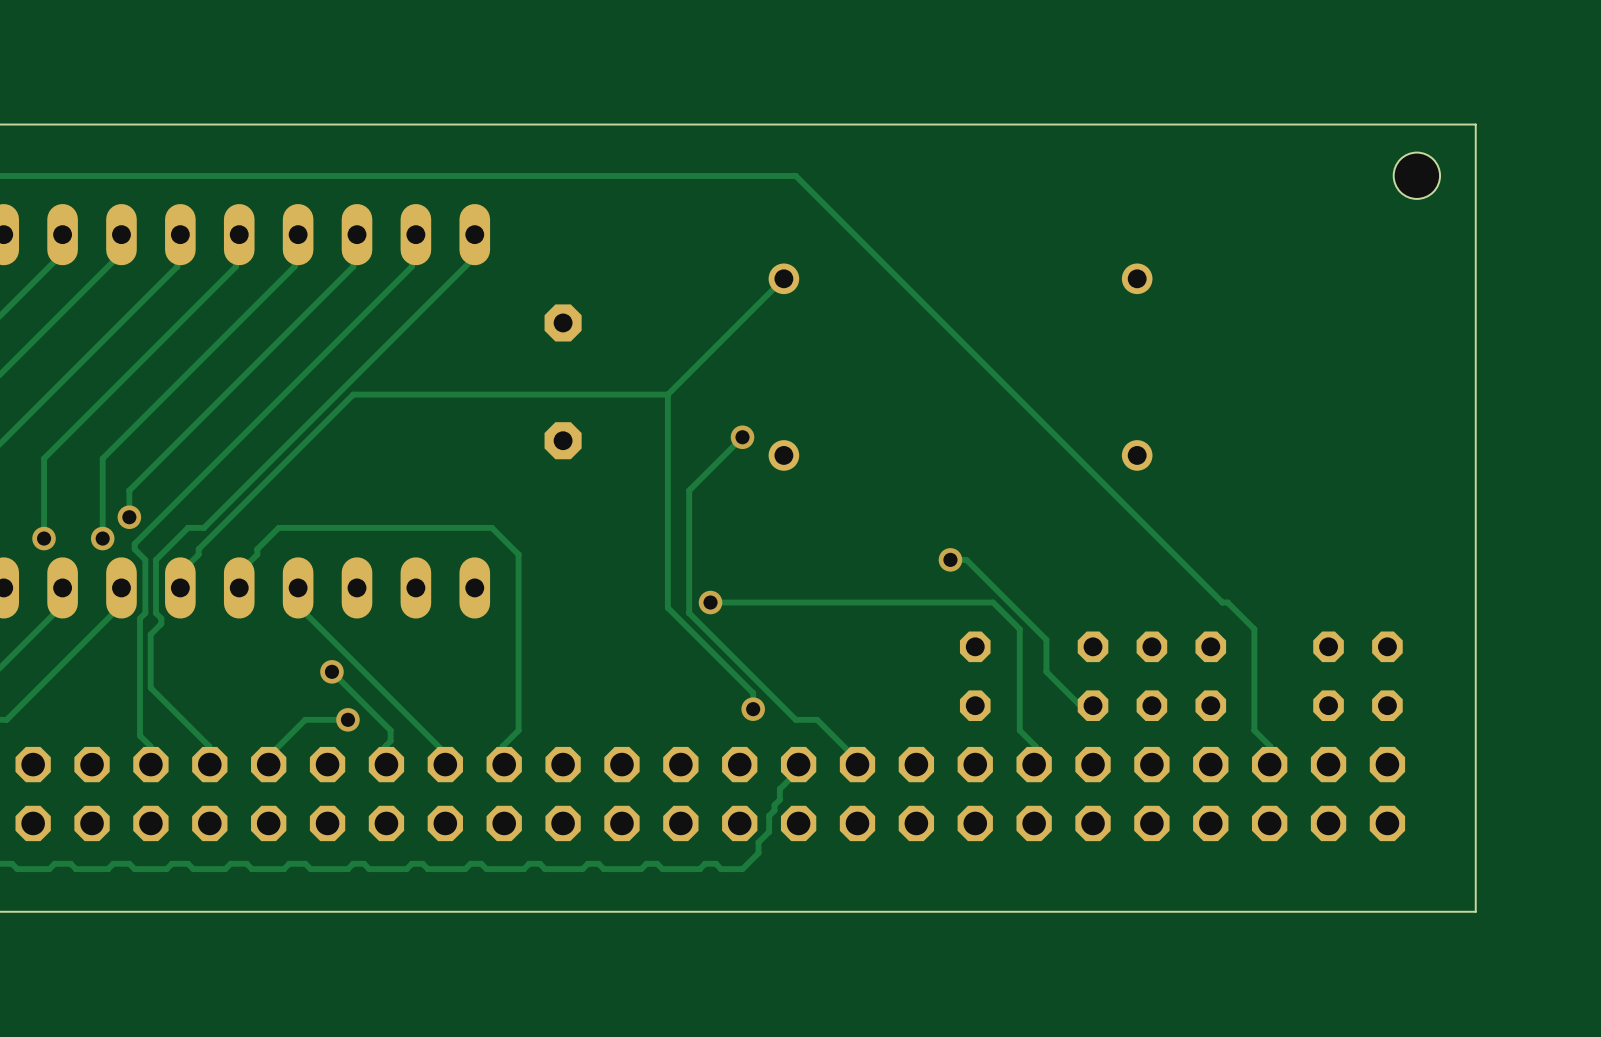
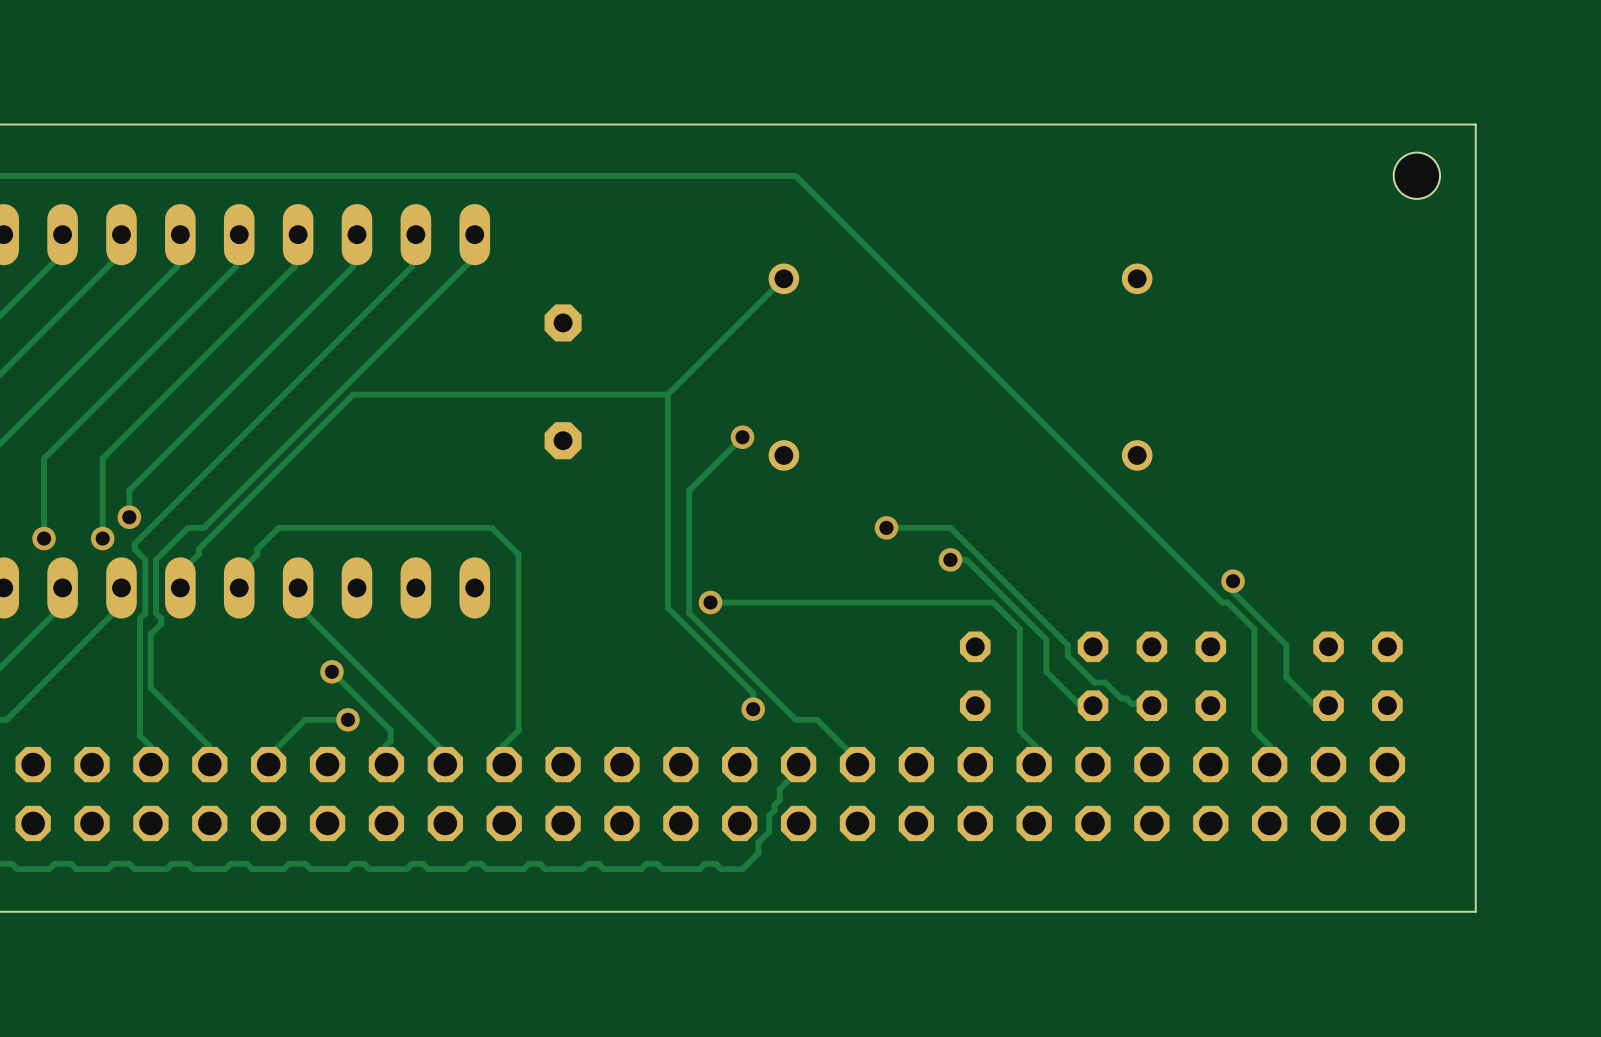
track: none -> (886, 527) (950, 527) (1067, 645) (1067, 655) (1094, 682) (1105, 682) (1121, 698) (1126, 698) (1131, 703) (1151, 705)
via: none -> (886, 527)
track: none -> (1233, 581) (1233, 591) (1286, 645) (1286, 677) (1313, 703) (1328, 705)
via: none -> (1233, 581)

